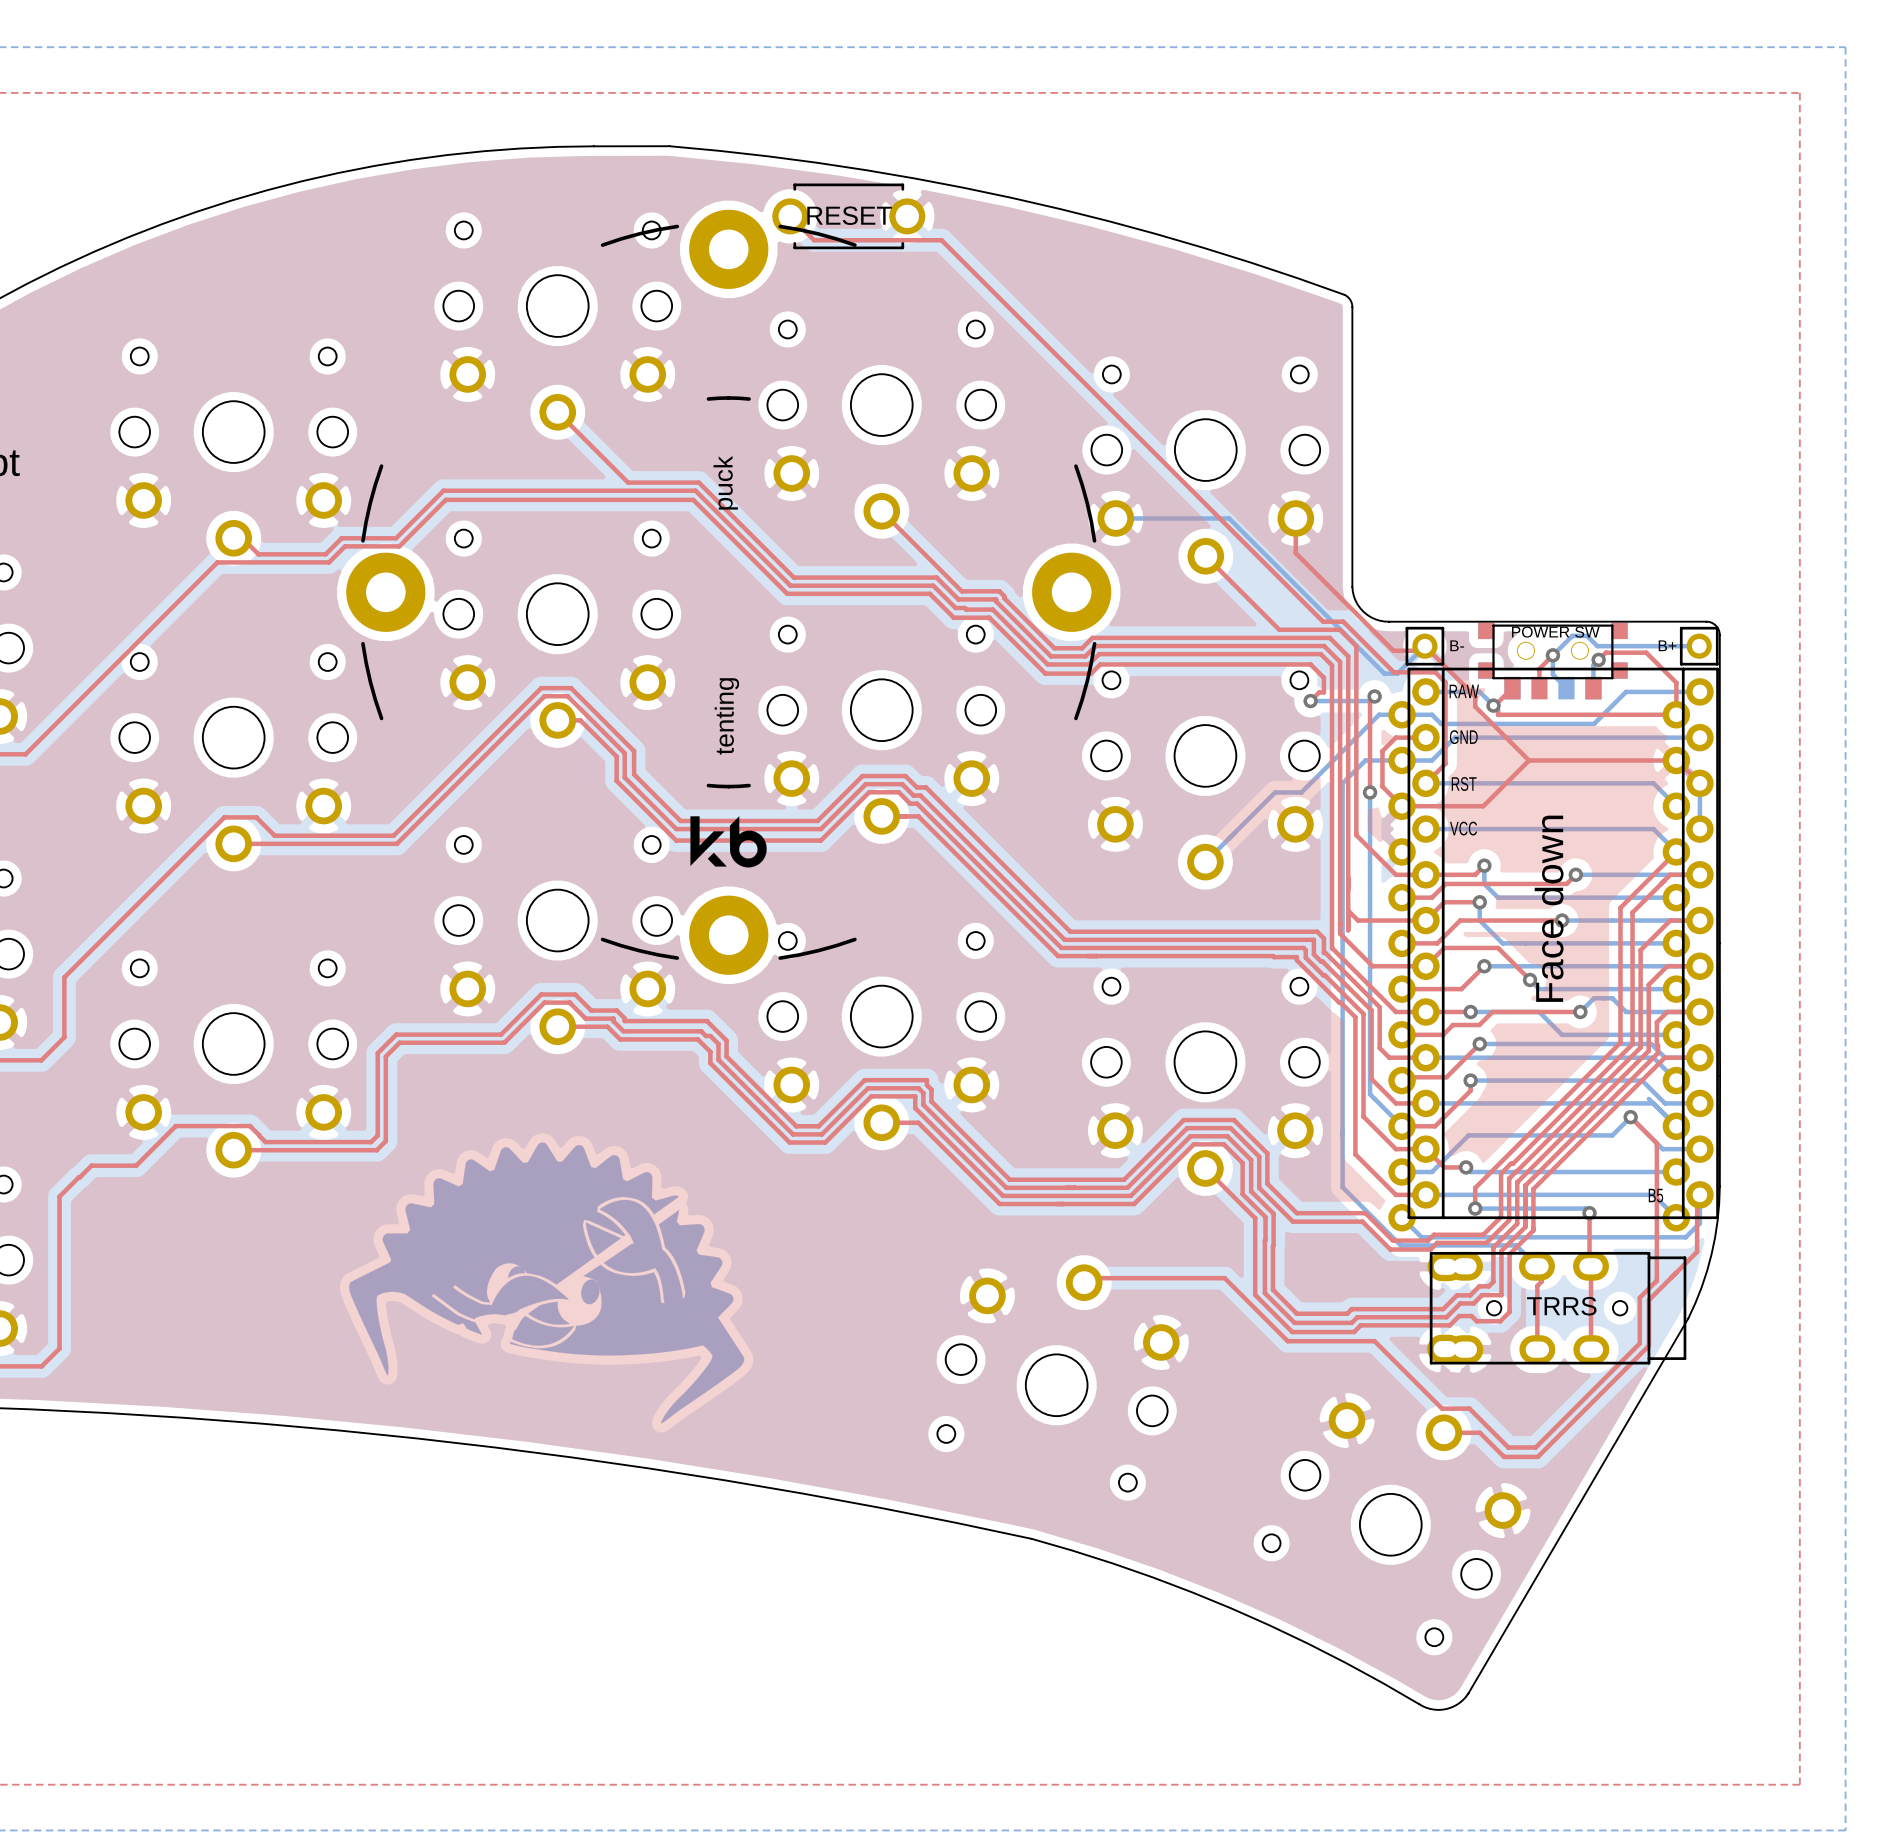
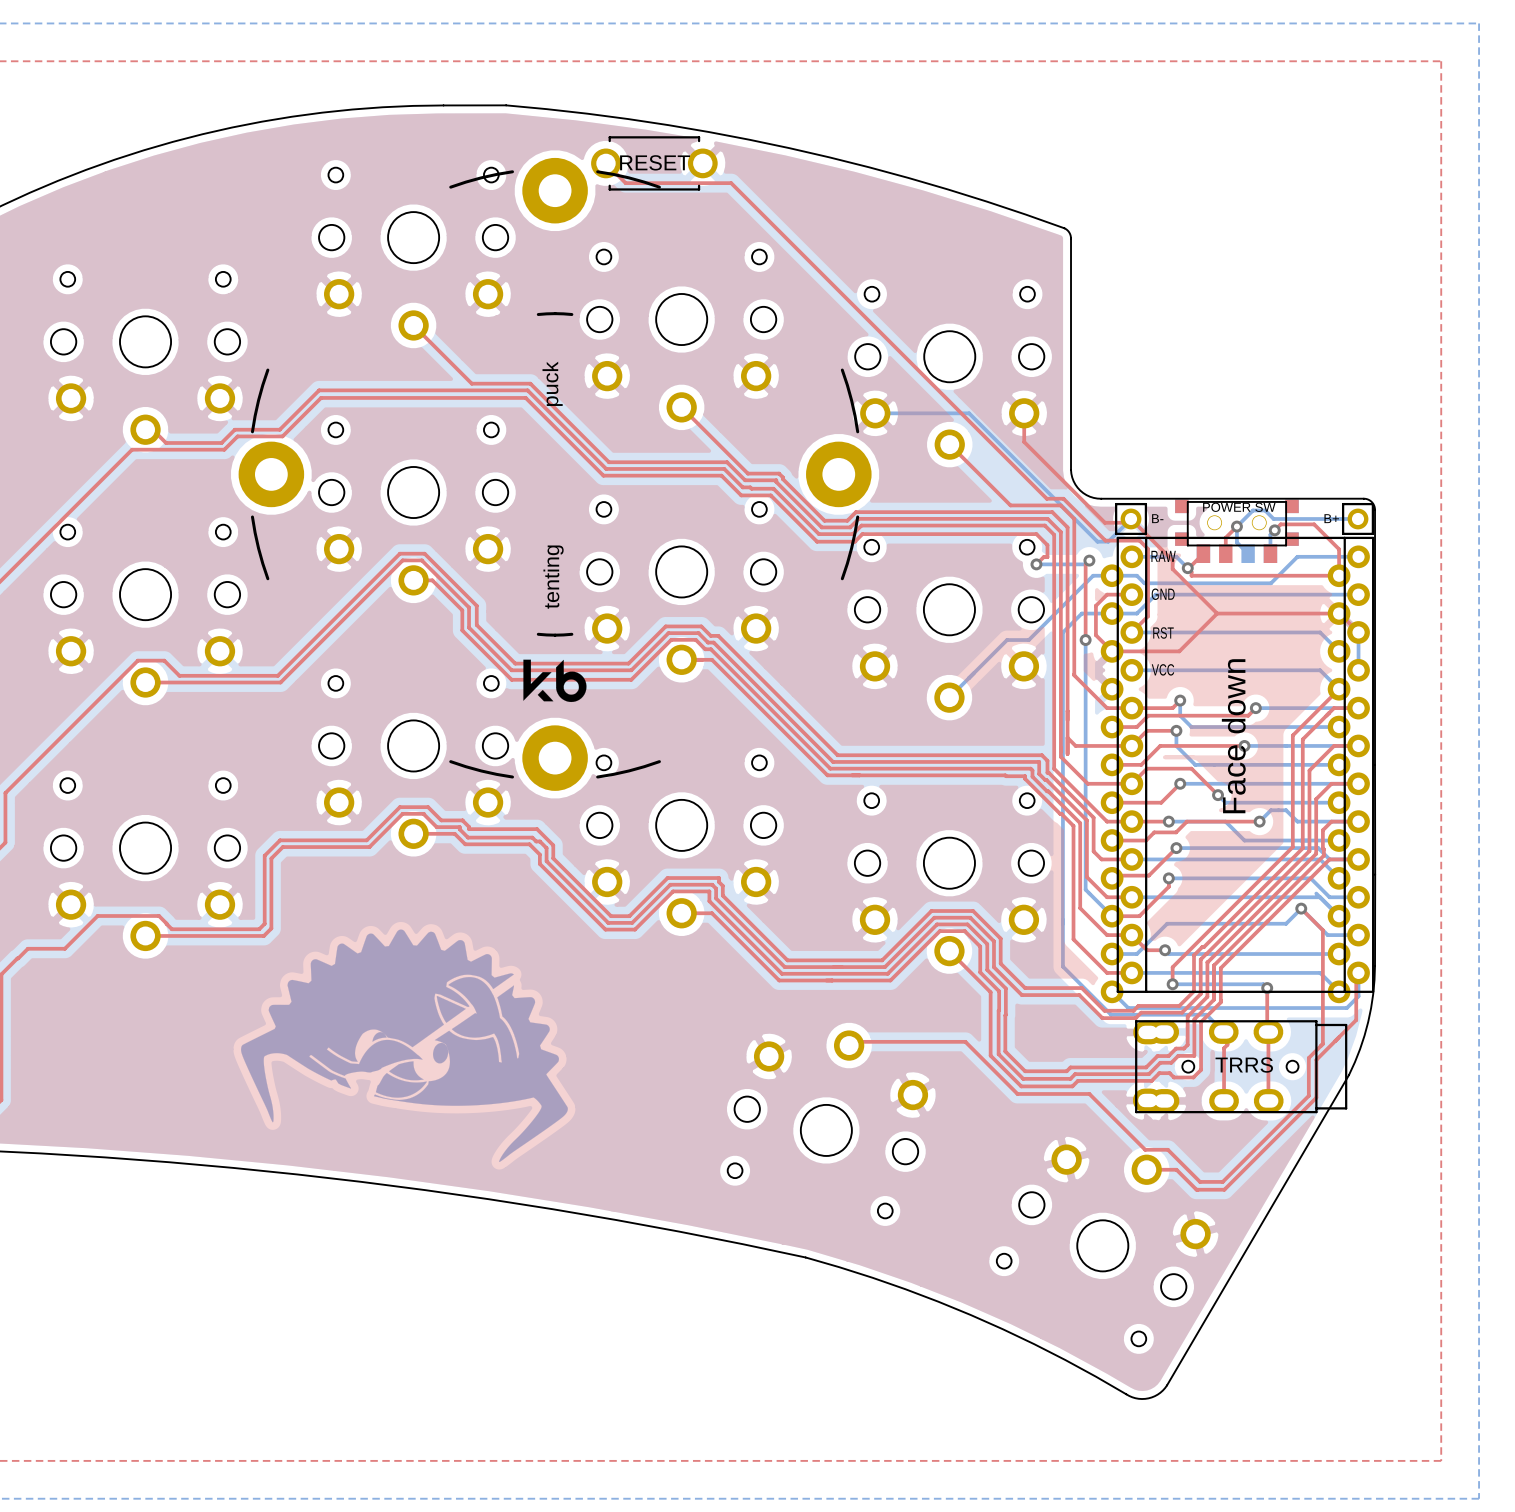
part text: B5 (1655, 1195) -> none

